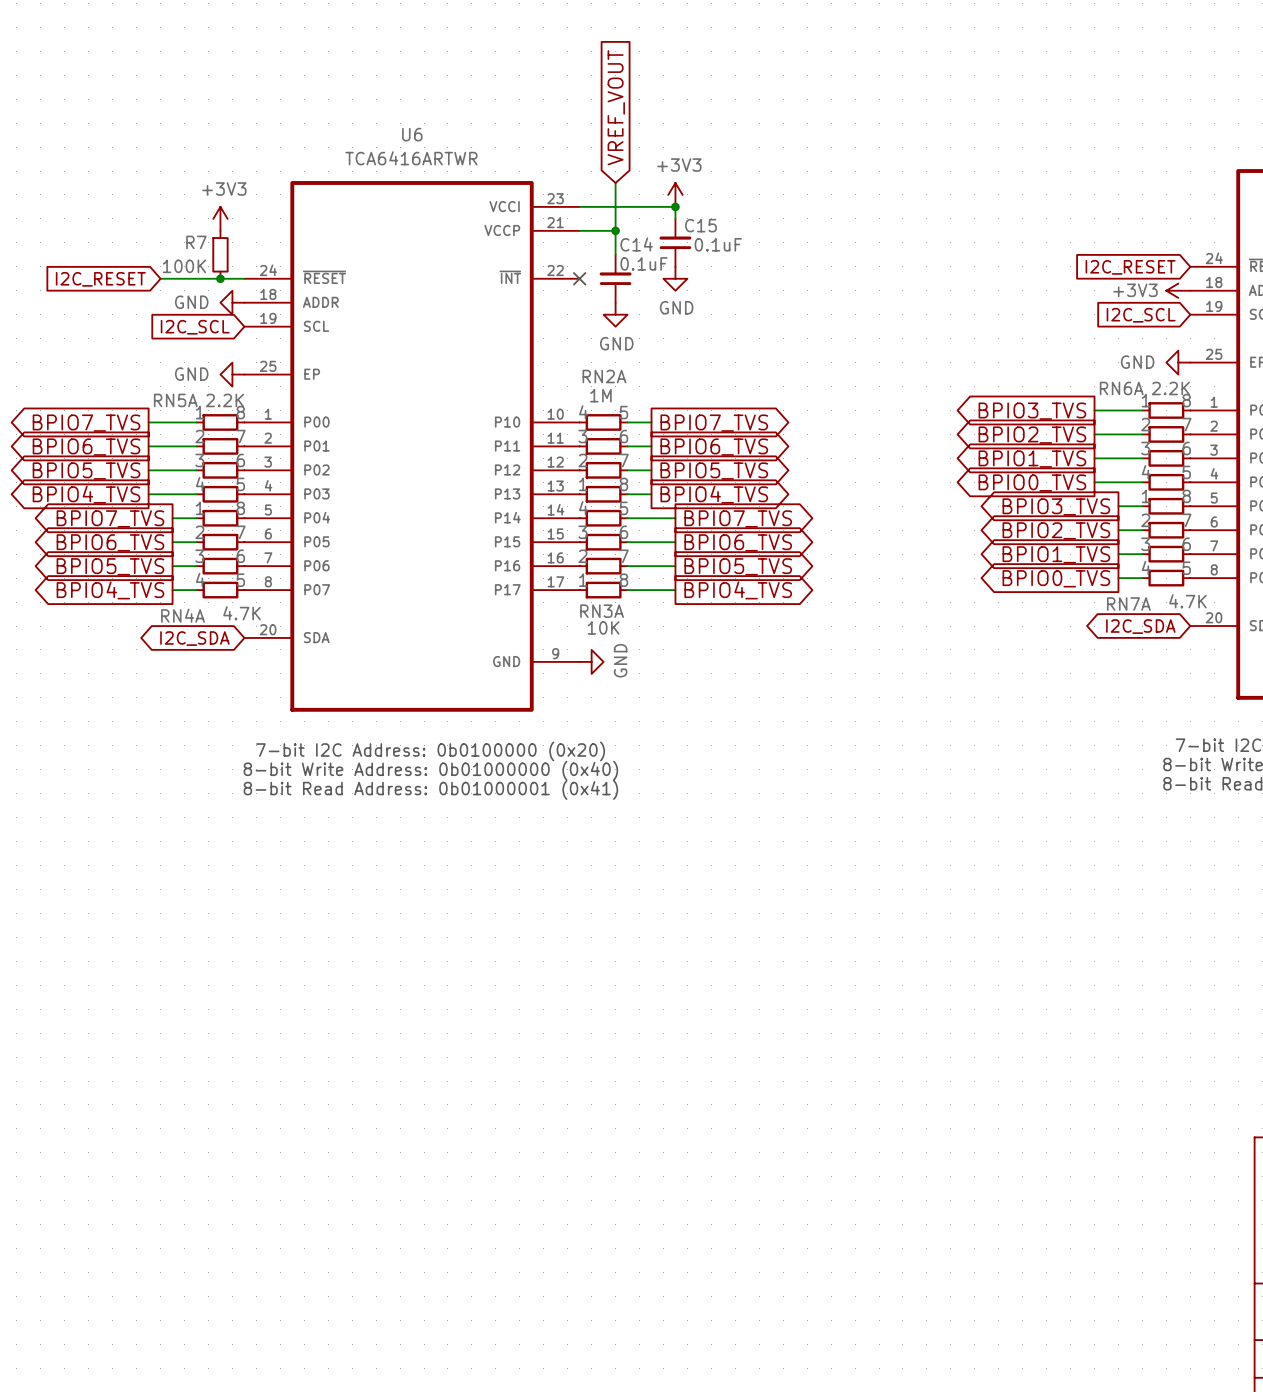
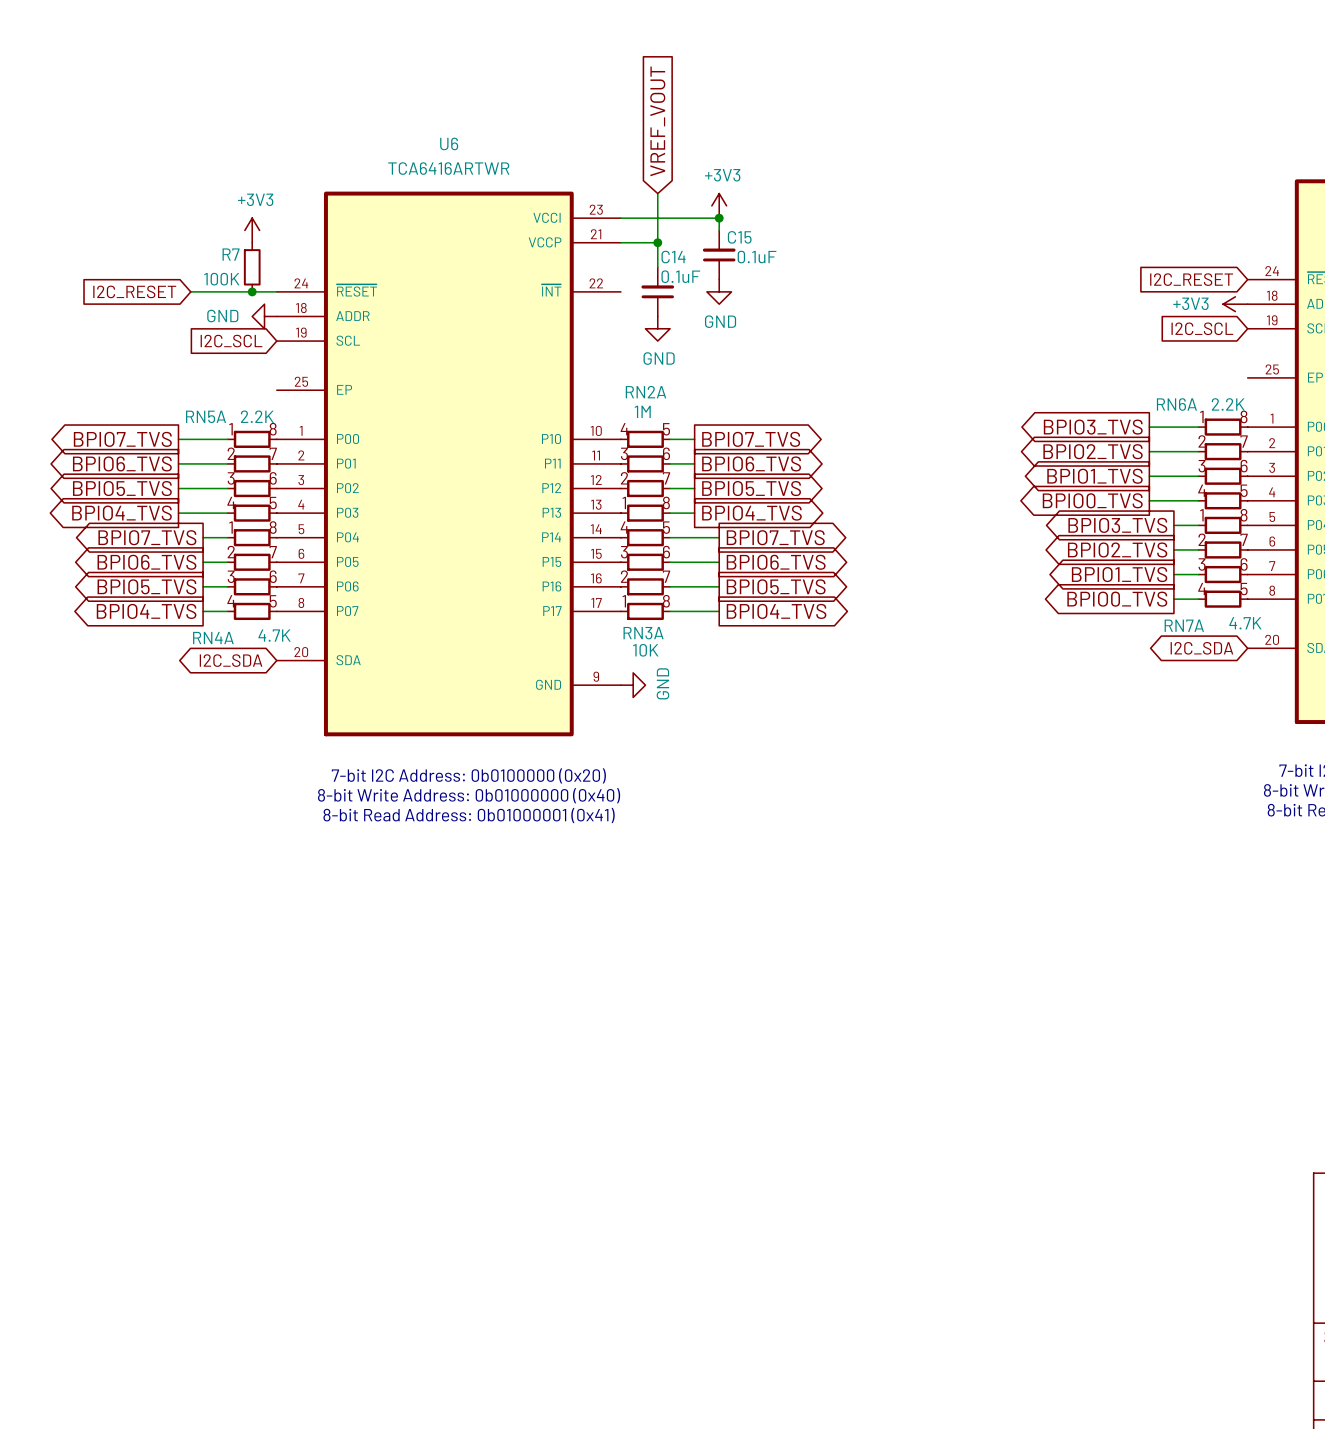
no-connect mark: (579, 278) -> none
power symbol: GND (1178, 362) -> none
power symbol: GND (232, 374) -> none

